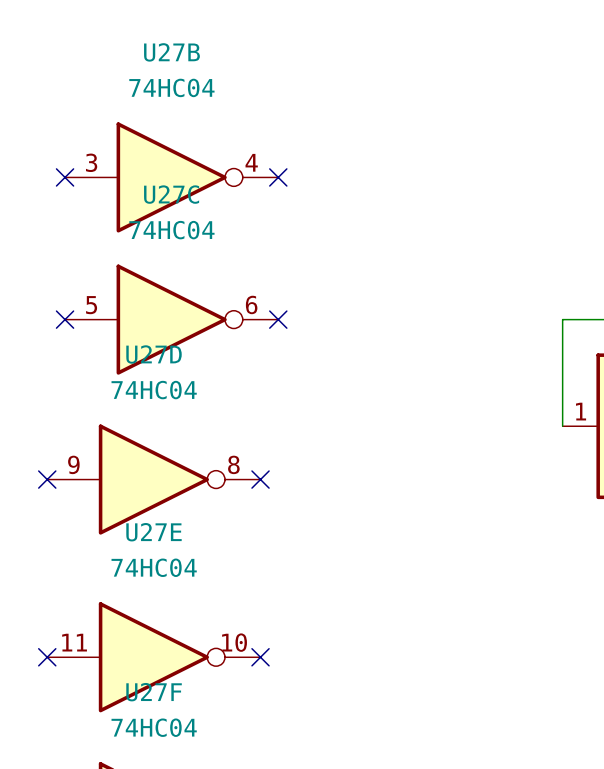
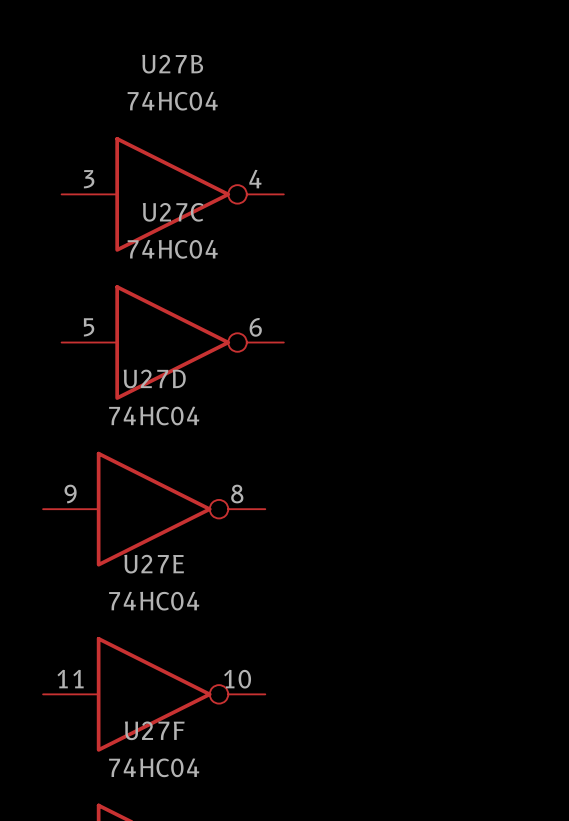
no-connect mark: (65, 177) -> none
no-connect mark: (278, 177) -> none
no-connect mark: (65, 319) -> none
no-connect mark: (278, 319) -> none
no-connect mark: (47, 479) -> none
no-connect mark: (260, 479) -> none
no-connect mark: (47, 657) -> none
no-connect mark: (260, 657) -> none

